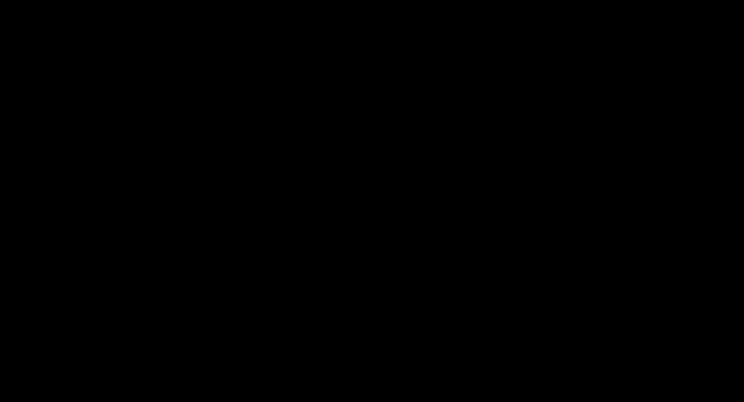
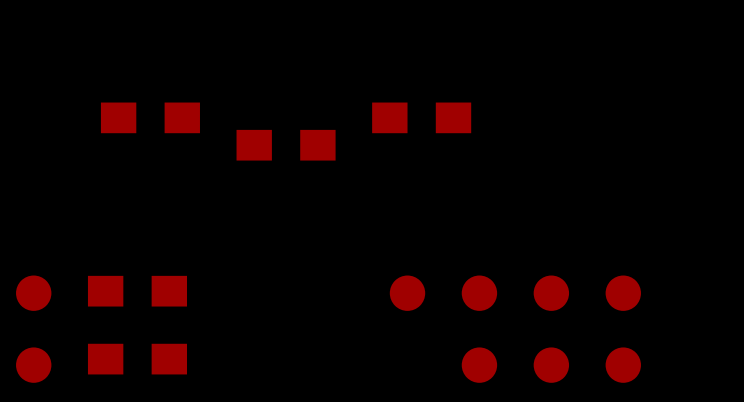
part: none -> (150, 117)
part: none -> (421, 117)
part: none -> (286, 145)
part: none -> (137, 291)
part: none -> (33, 293)
part: none -> (407, 293)
part: none -> (479, 293)
part: none -> (551, 293)
part: none -> (623, 293)
part: none -> (137, 359)
part: none -> (33, 365)
part: none -> (479, 365)
part: none -> (551, 365)
part: none -> (623, 365)

